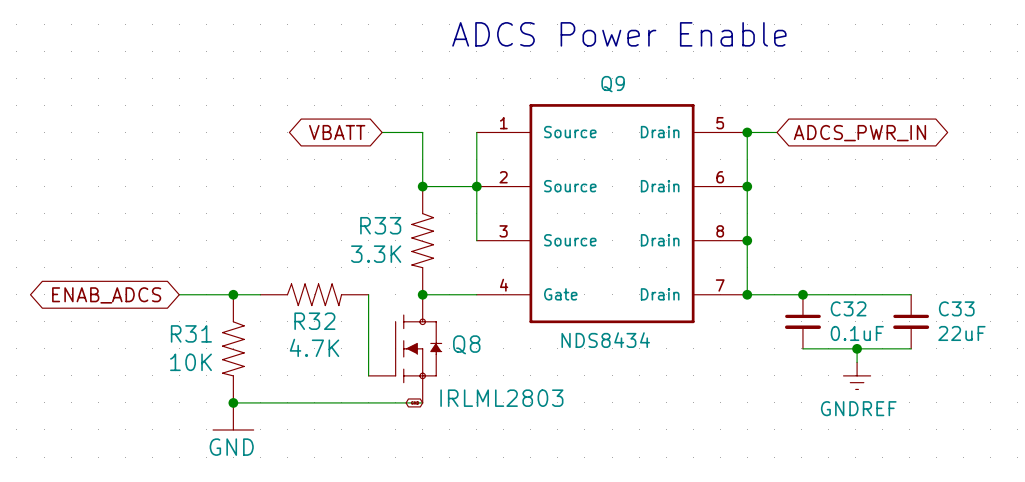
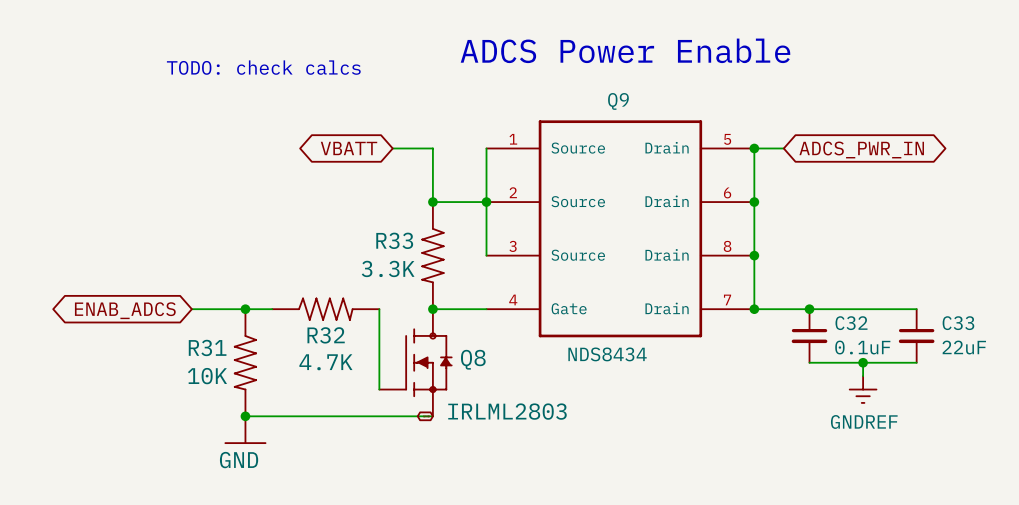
text: none -> TODO: check calcs (263, 67)

